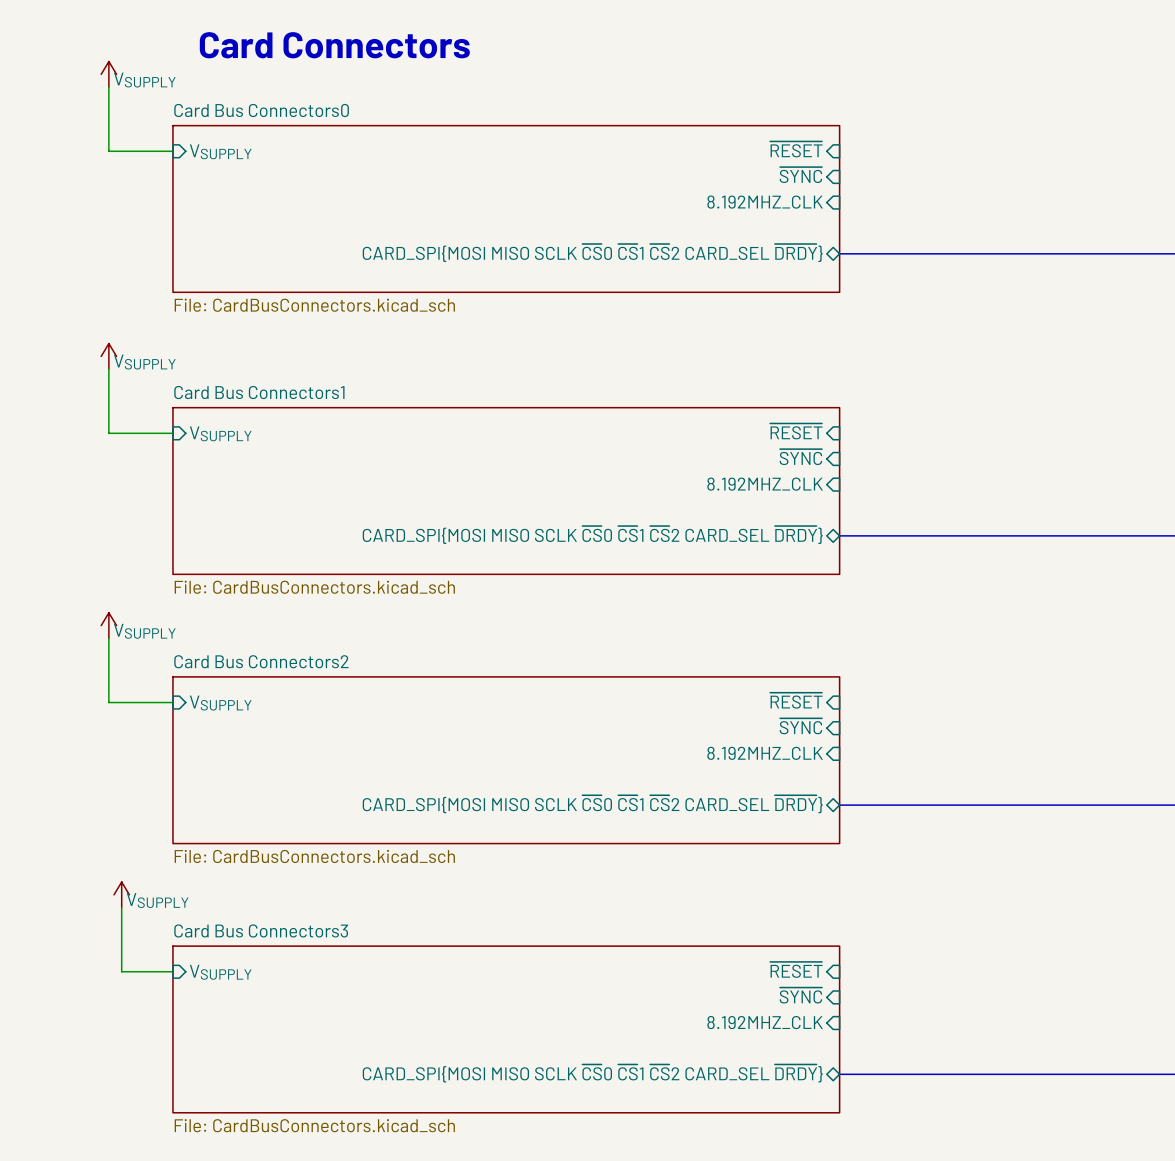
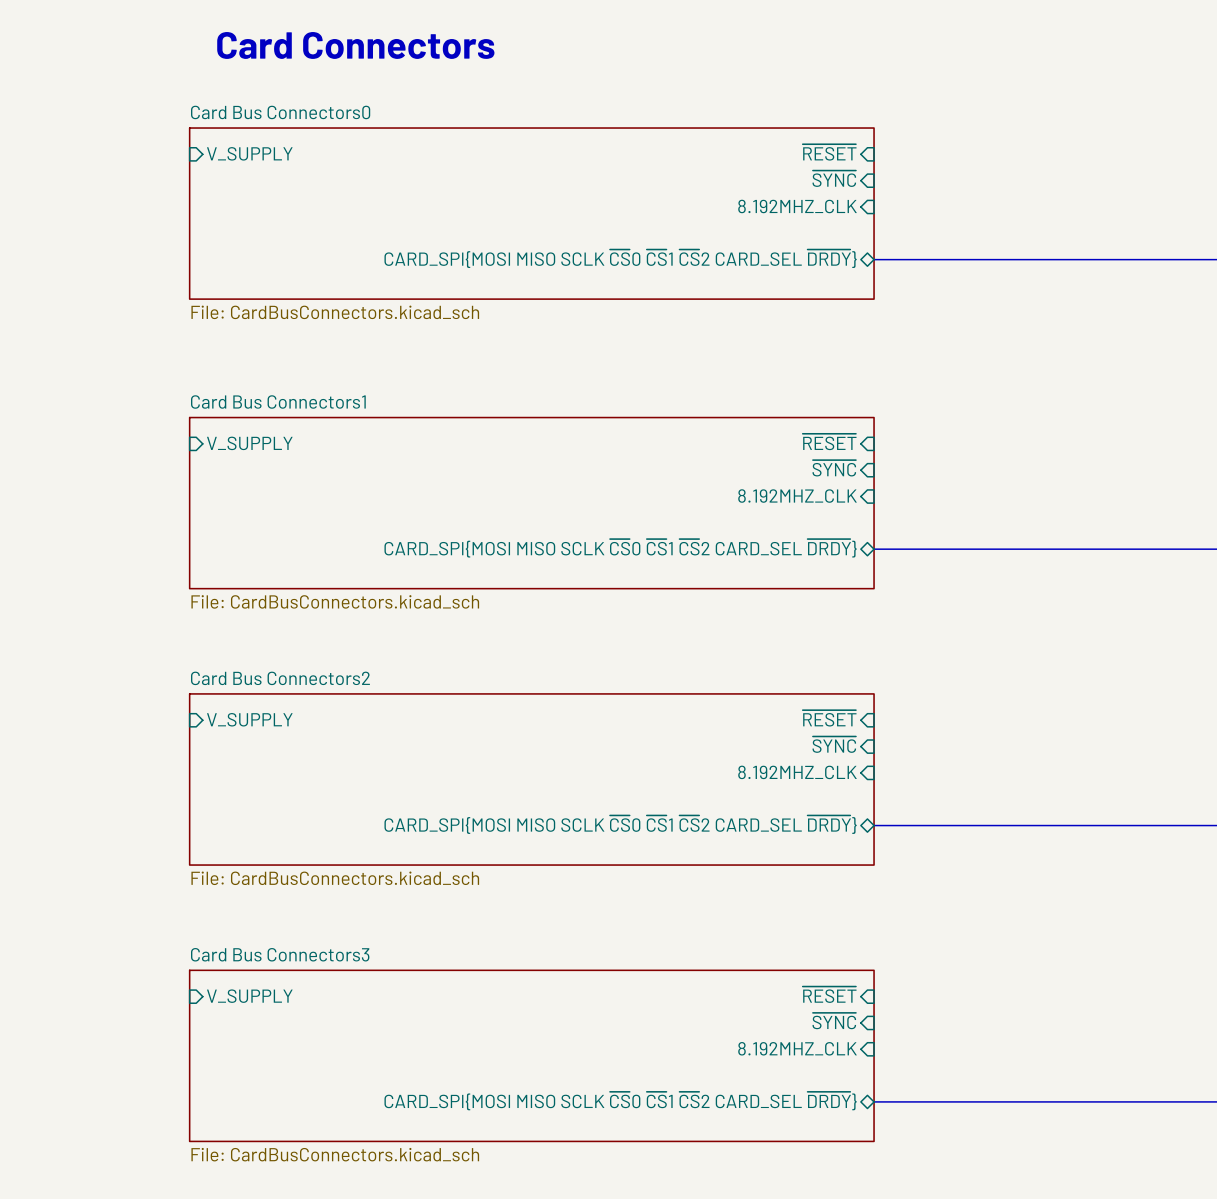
power symbol: VSUPPLY (108, 74) -> none
wire: (108, 87) (108, 151) (172, 151) -> none
sheet pin: VSUPPLY (220, 151) -> V_SUPPLY (249, 153)
power symbol: VSUPPLY (108, 356) -> none
wire: (108, 369) (108, 433) (172, 433) -> none
sheet pin: VSUPPLY (220, 433) -> V_SUPPLY (249, 443)
power symbol: VSUPPLY (108, 625) -> none
wire: (108, 638) (108, 702) (172, 702) -> none
sheet pin: VSUPPLY (220, 703) -> V_SUPPLY (249, 719)
power symbol: VSUPPLY (121, 894) -> none
wire: (121, 907) (121, 971) (172, 971) -> none
sheet pin: VSUPPLY (220, 972) -> V_SUPPLY (249, 996)

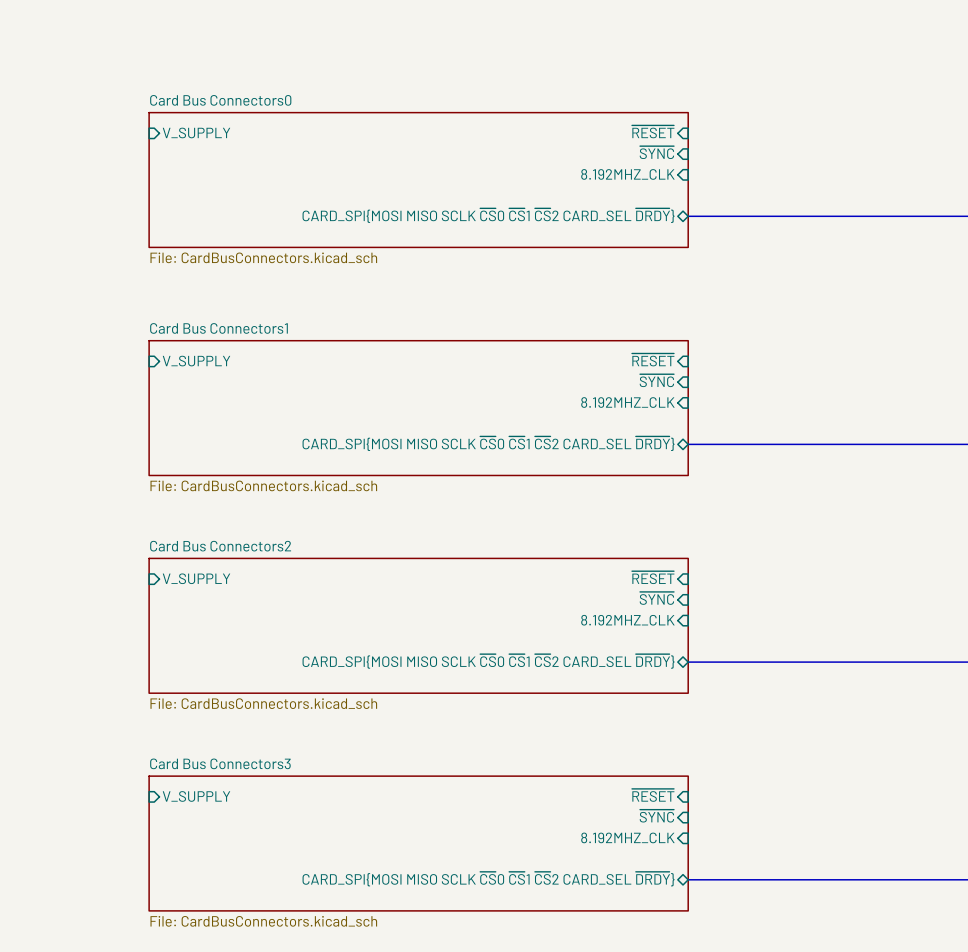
text: Card Connectors (355, 45) -> none

